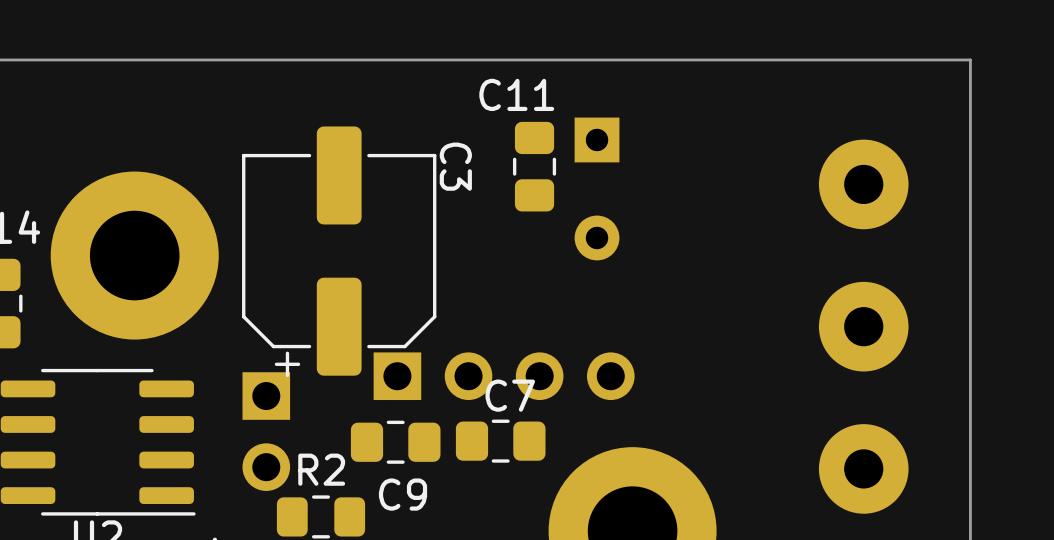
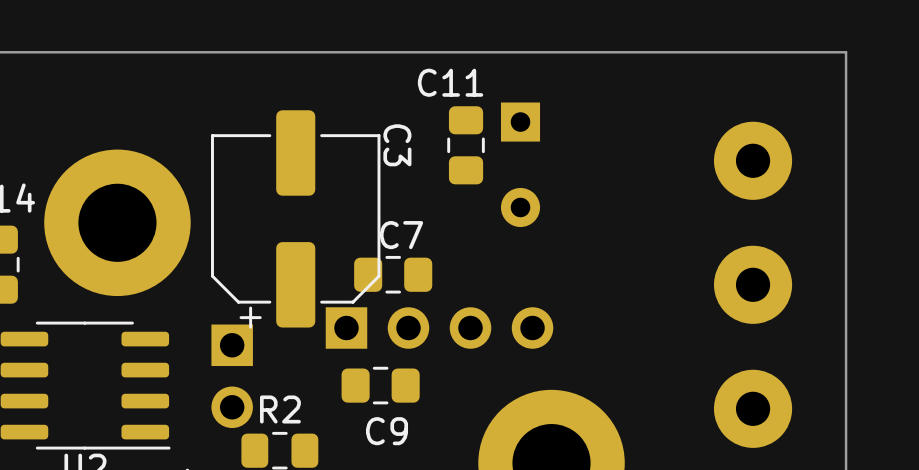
C7 position: (500, 441) -> (393, 274)
C9 position: (395, 442) -> (380, 385)

